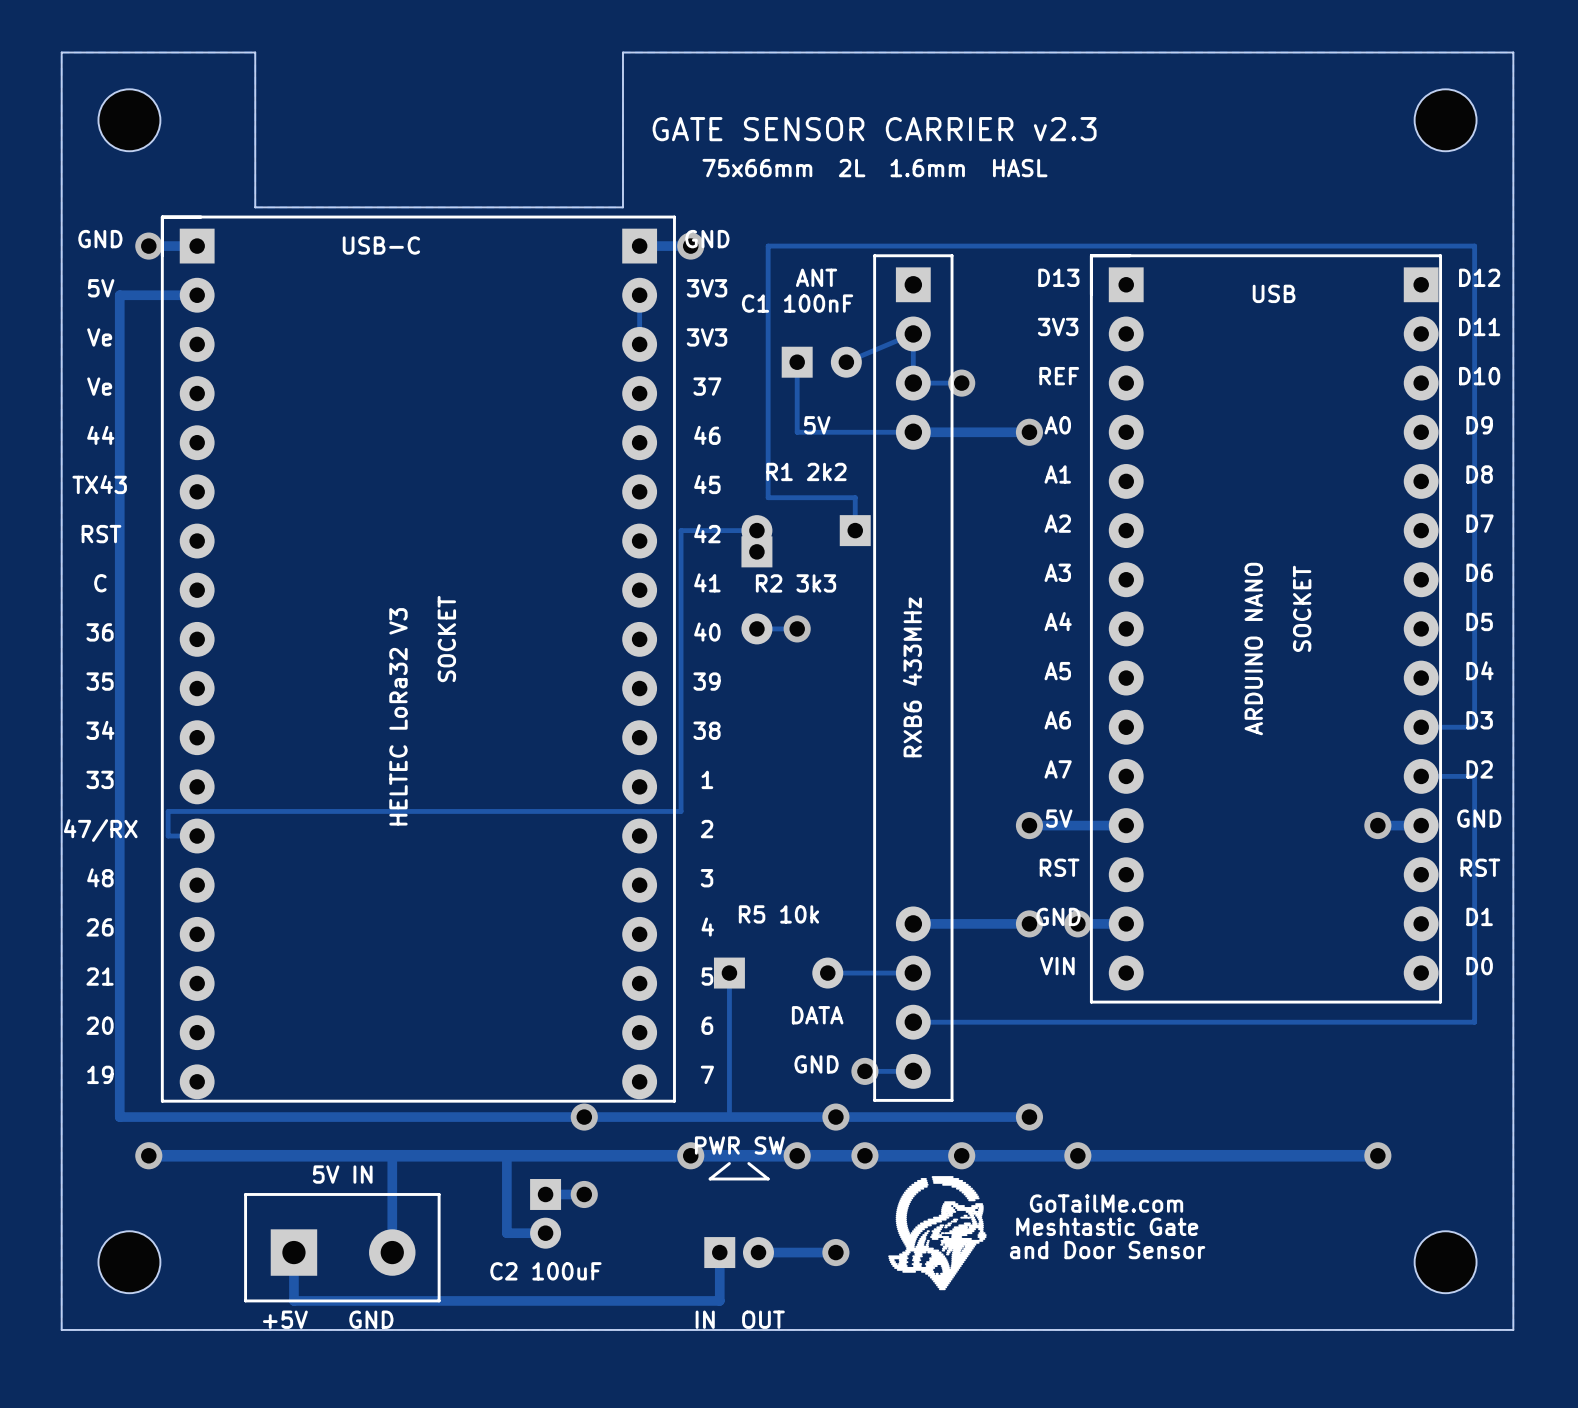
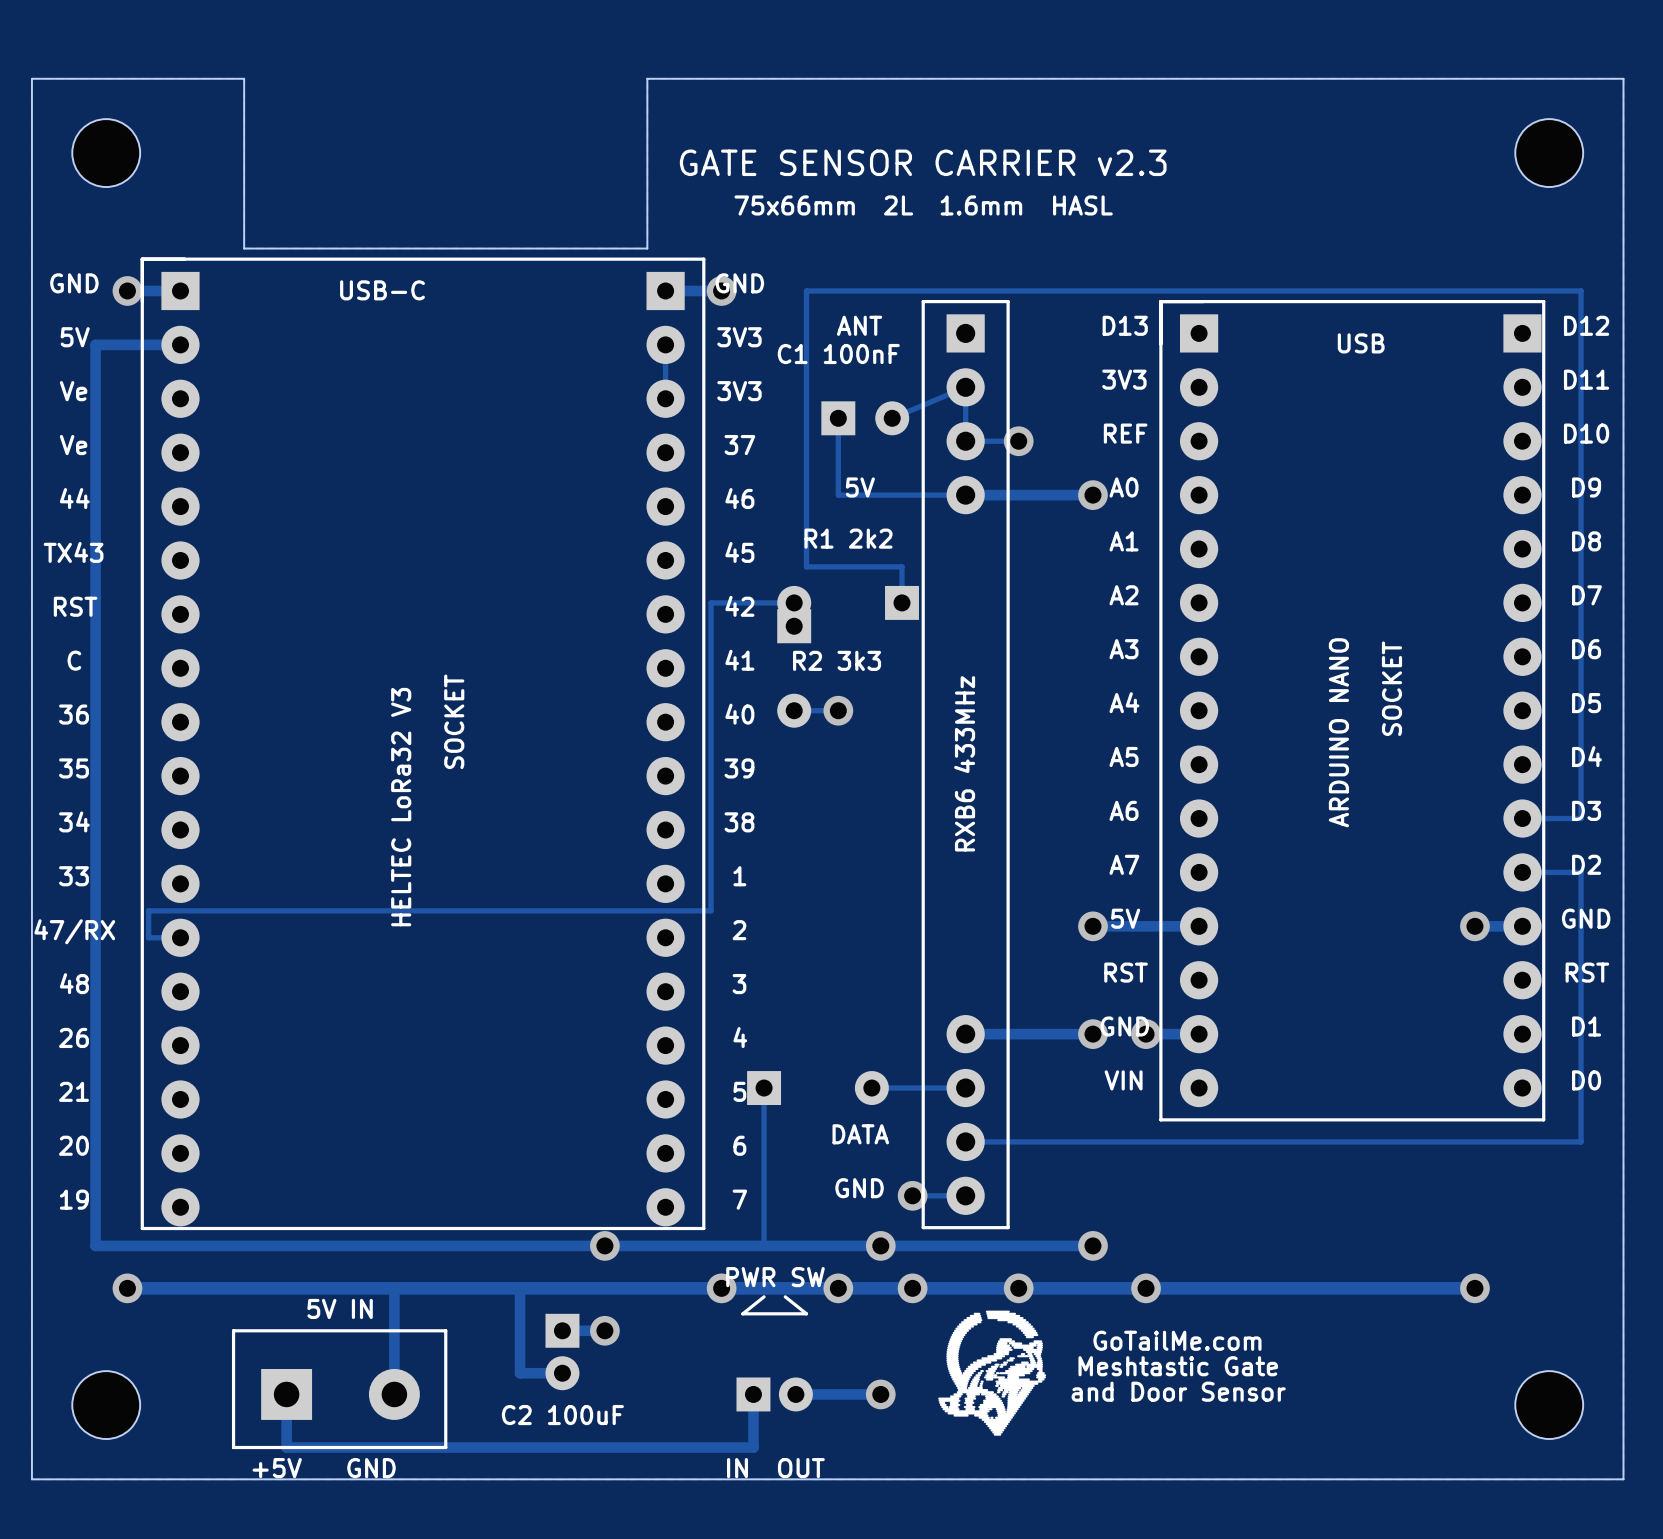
text: R5 10k (778, 914) -> none

